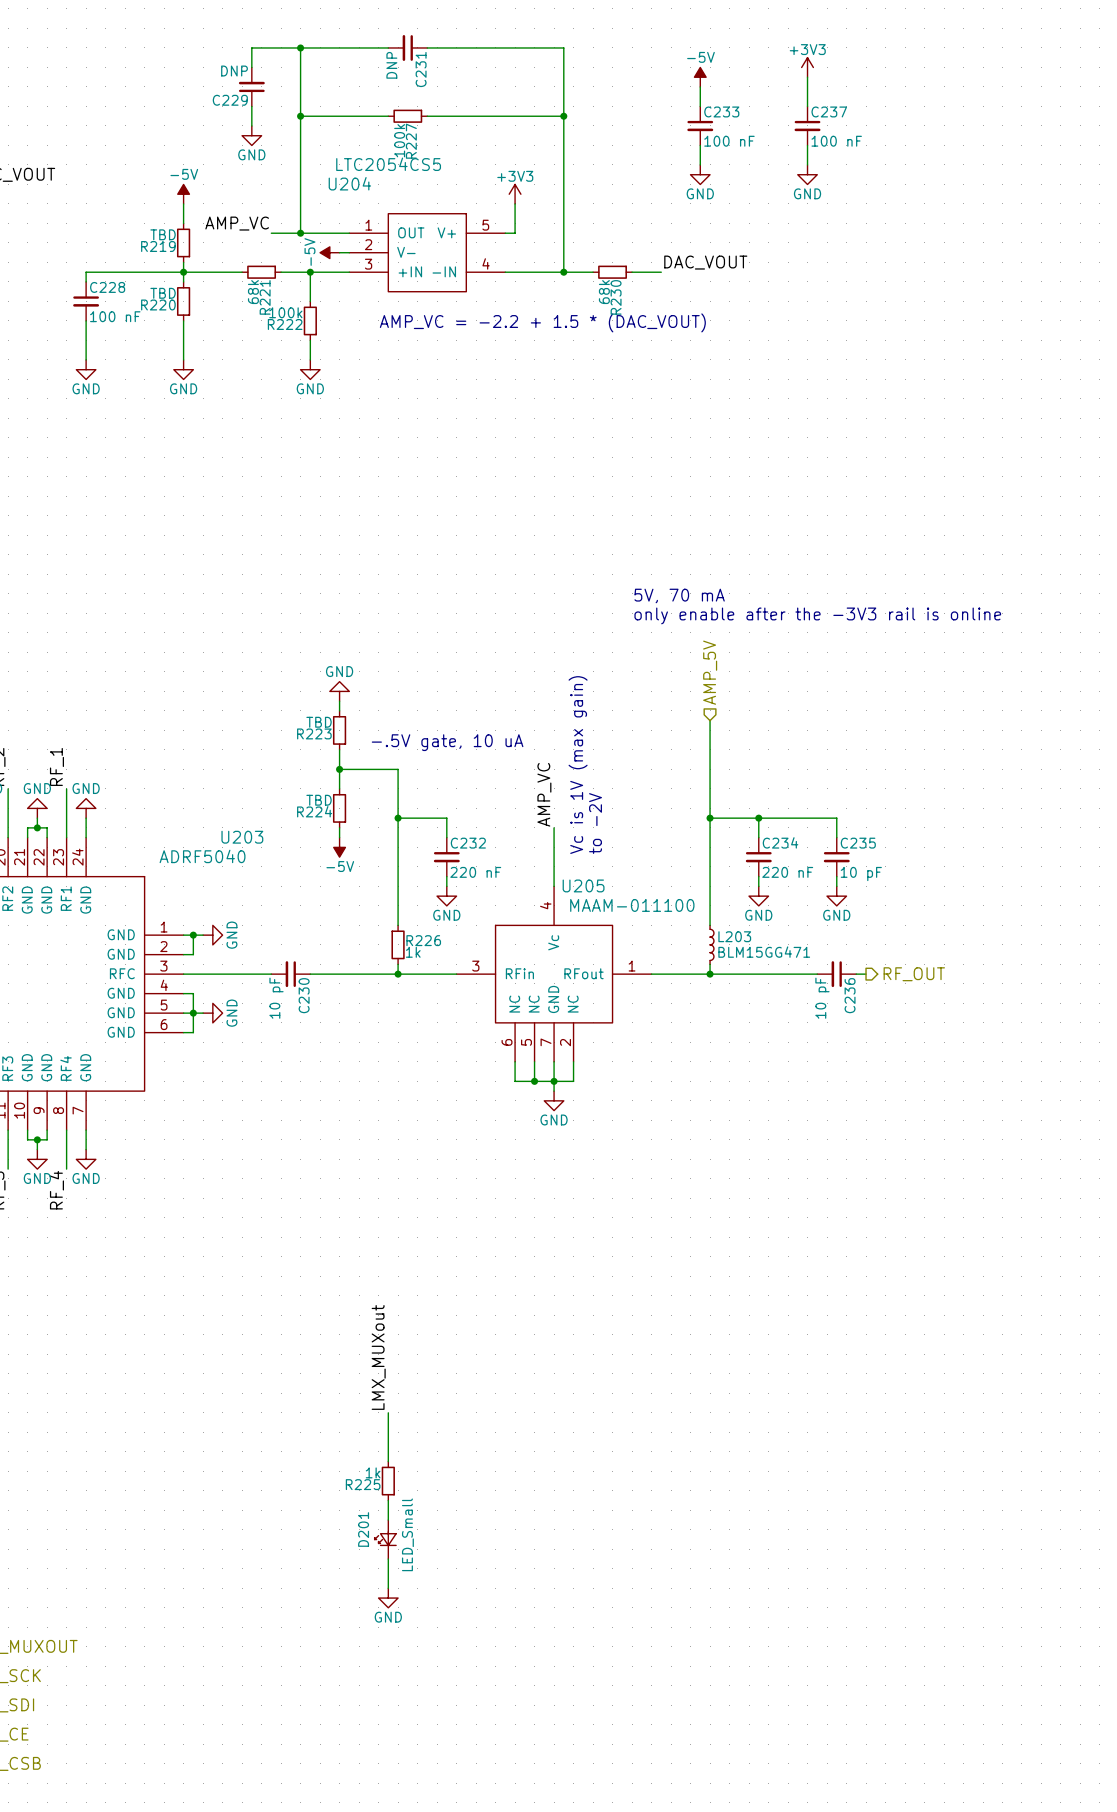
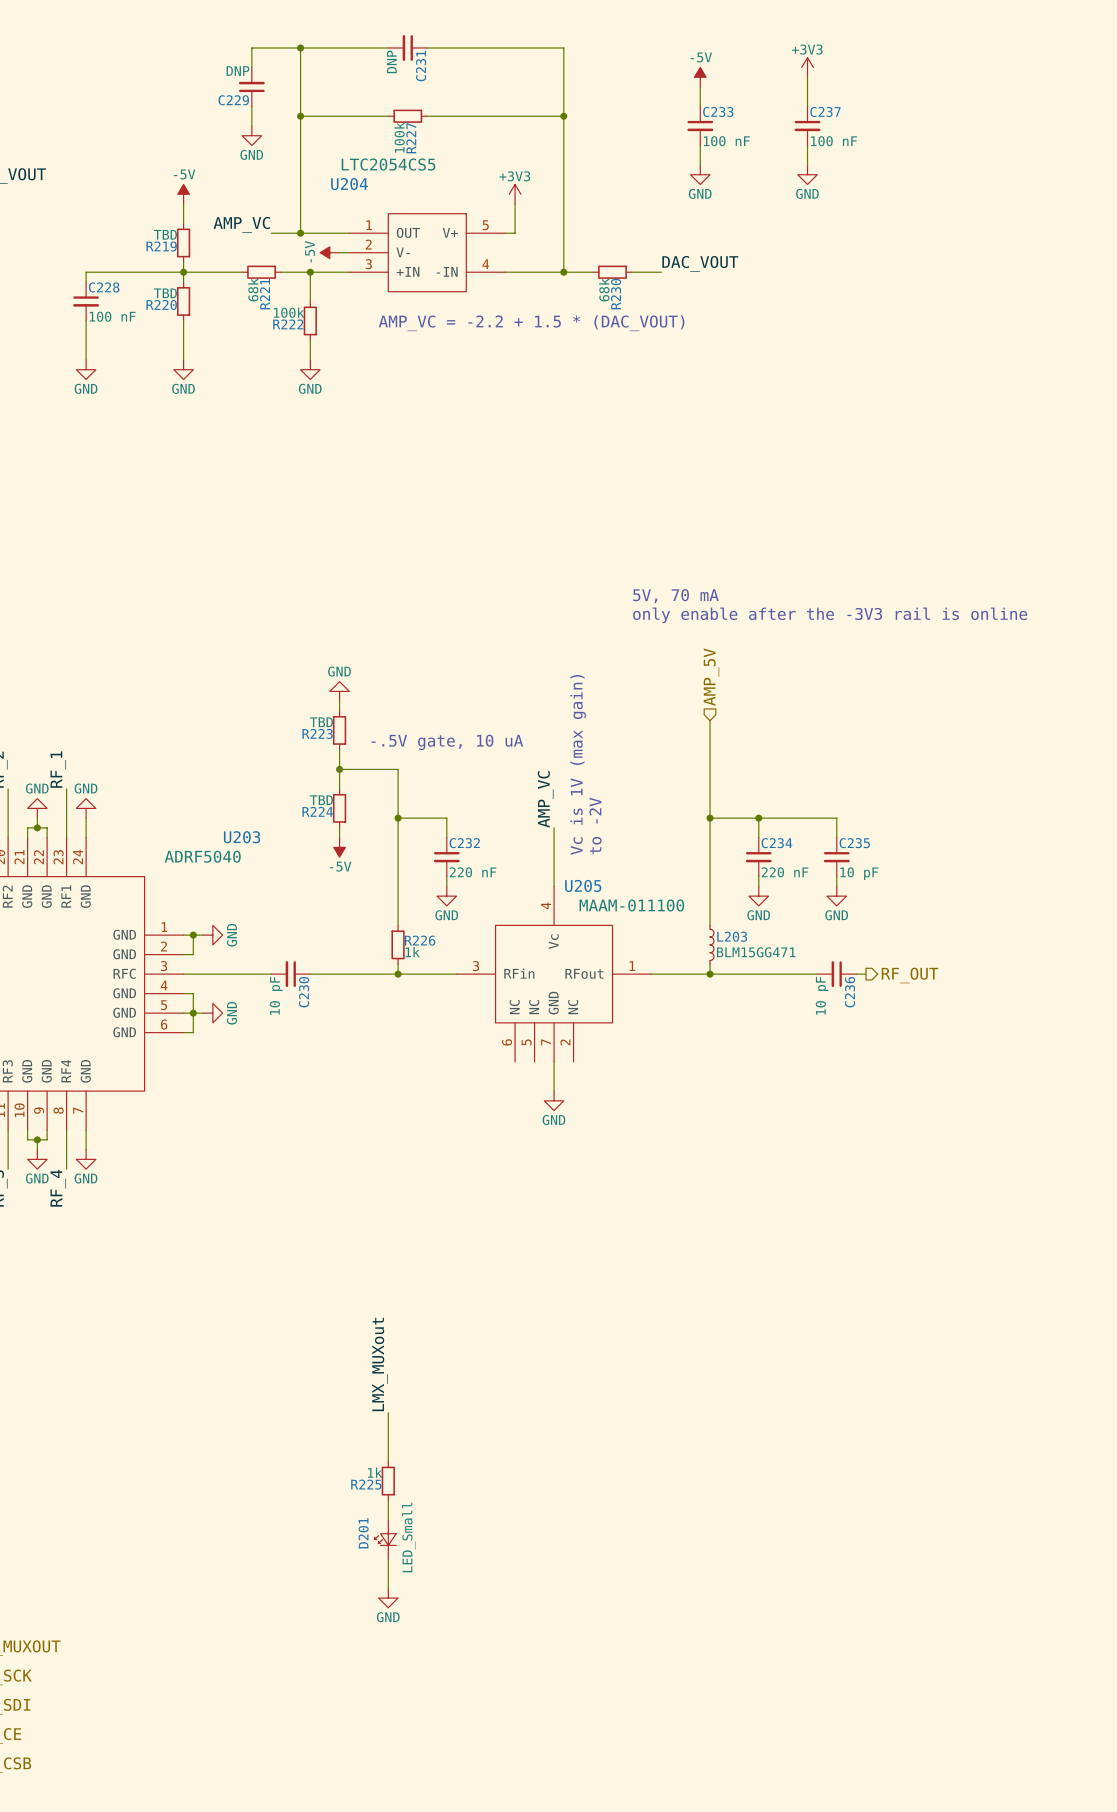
wire: (515, 1061) (515, 1081) (573, 1081) (573, 1061) -> none
wire: (534, 1061) (534, 1081) -> none
junction: (534, 1081) -> none
junction: (554, 1081) -> none

